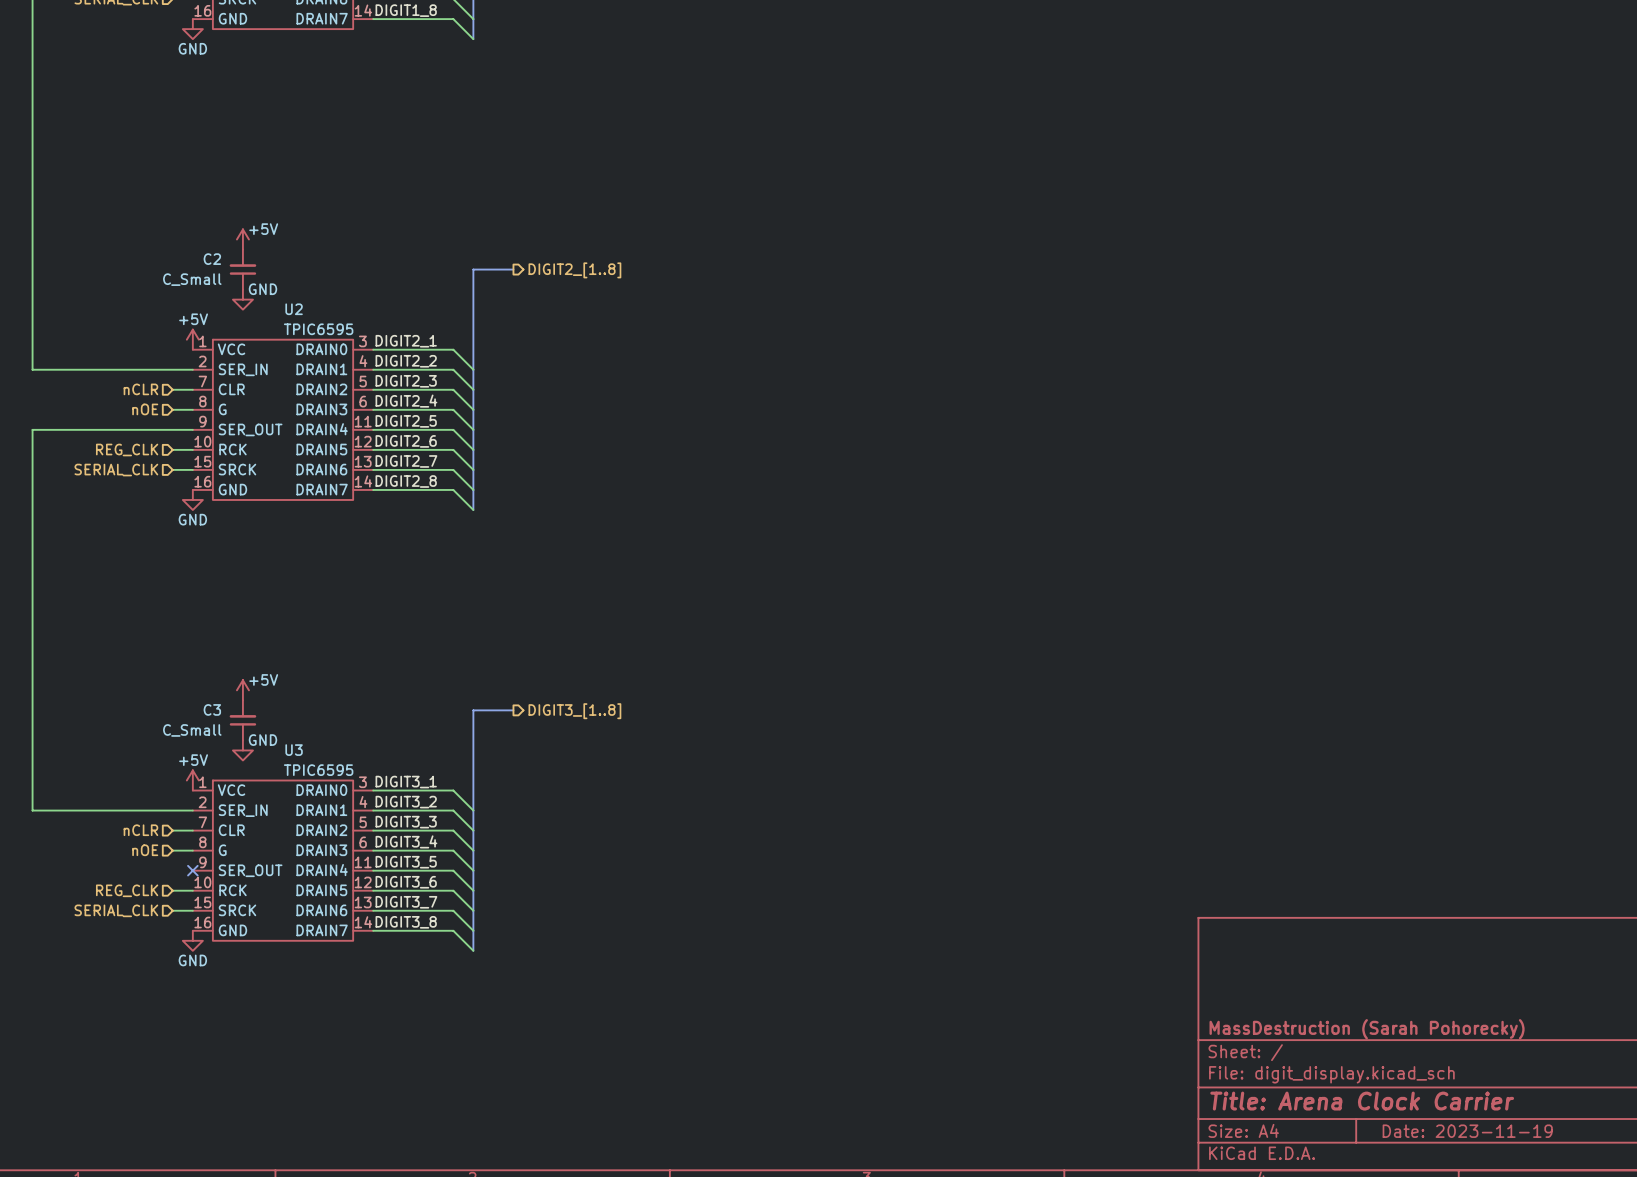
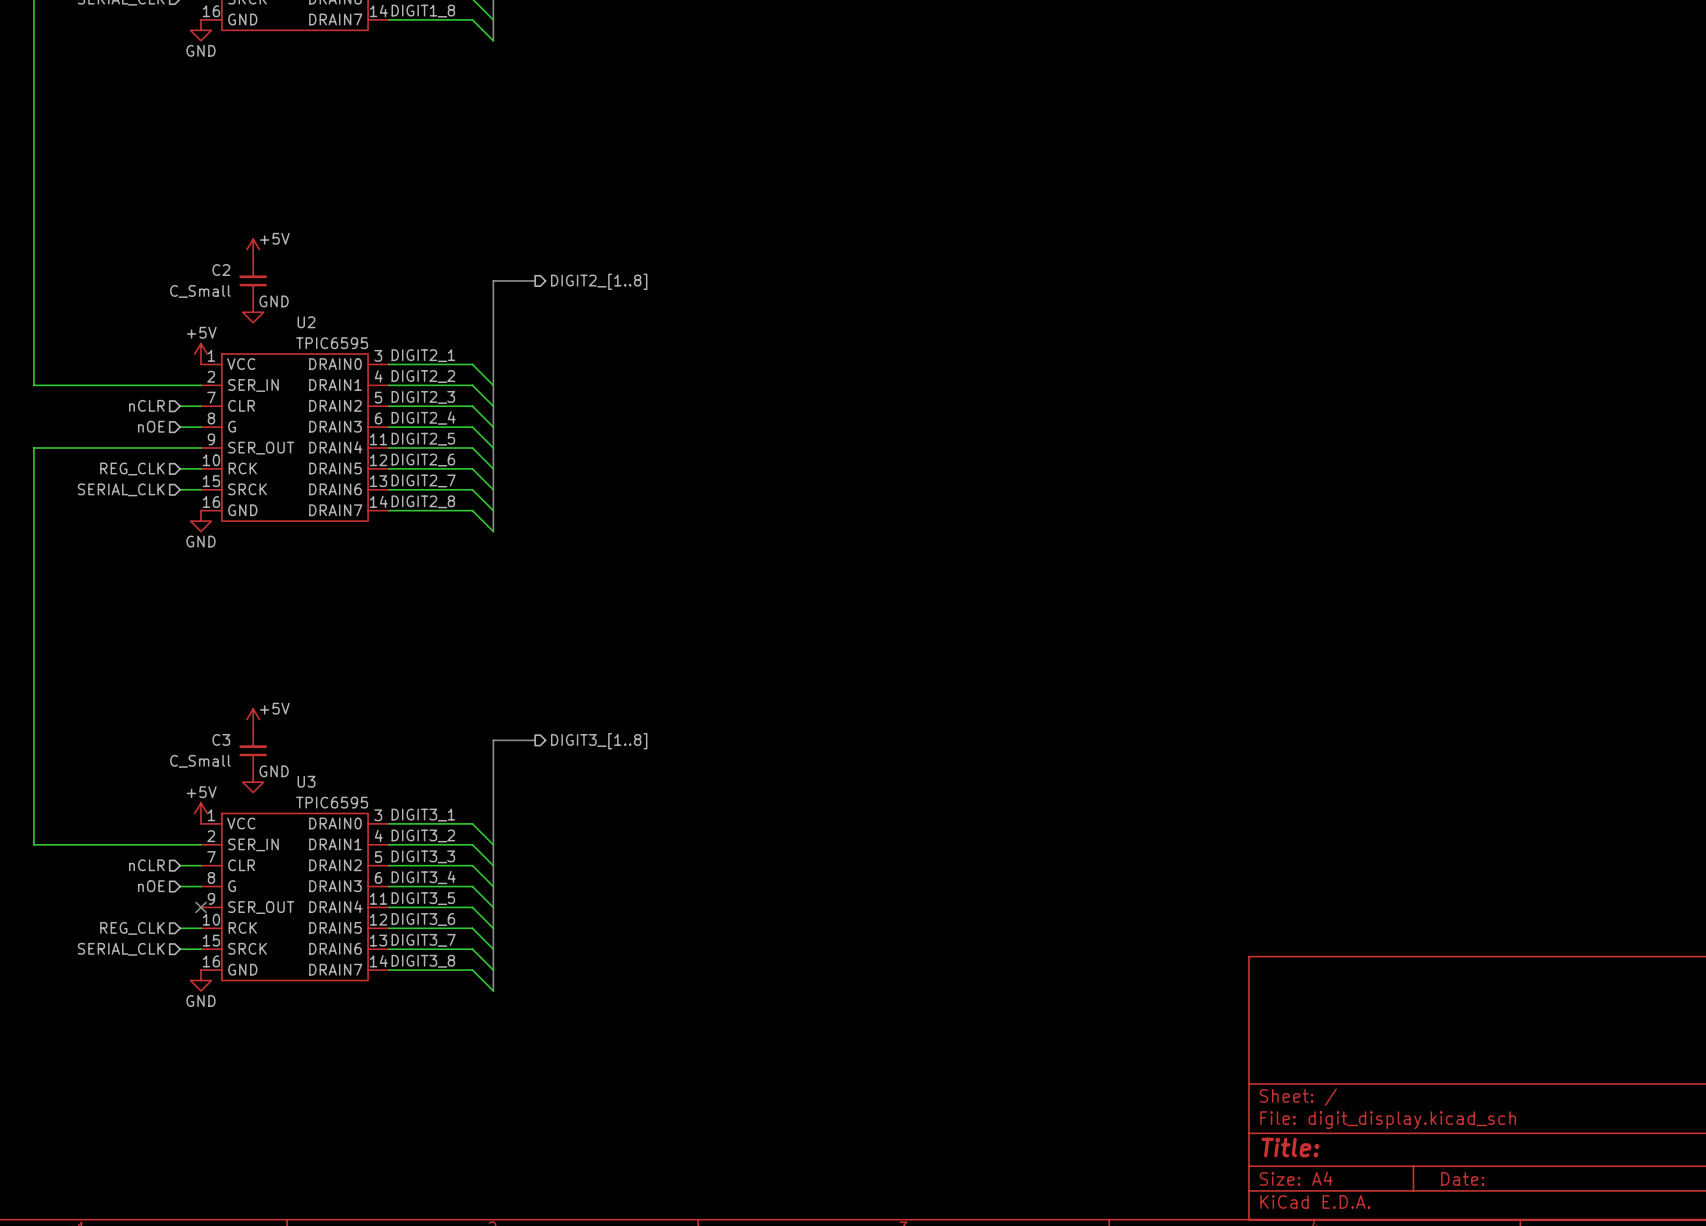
title block: MassDestruction (Sarah Pohorecky) (1367, 1029) -> none
title block: Title: Arena Clock Carrier (1362, 1101) -> Title: (1290, 1147)
title block: Date: 2023-11-19 (1467, 1131) -> Date: (1462, 1178)

